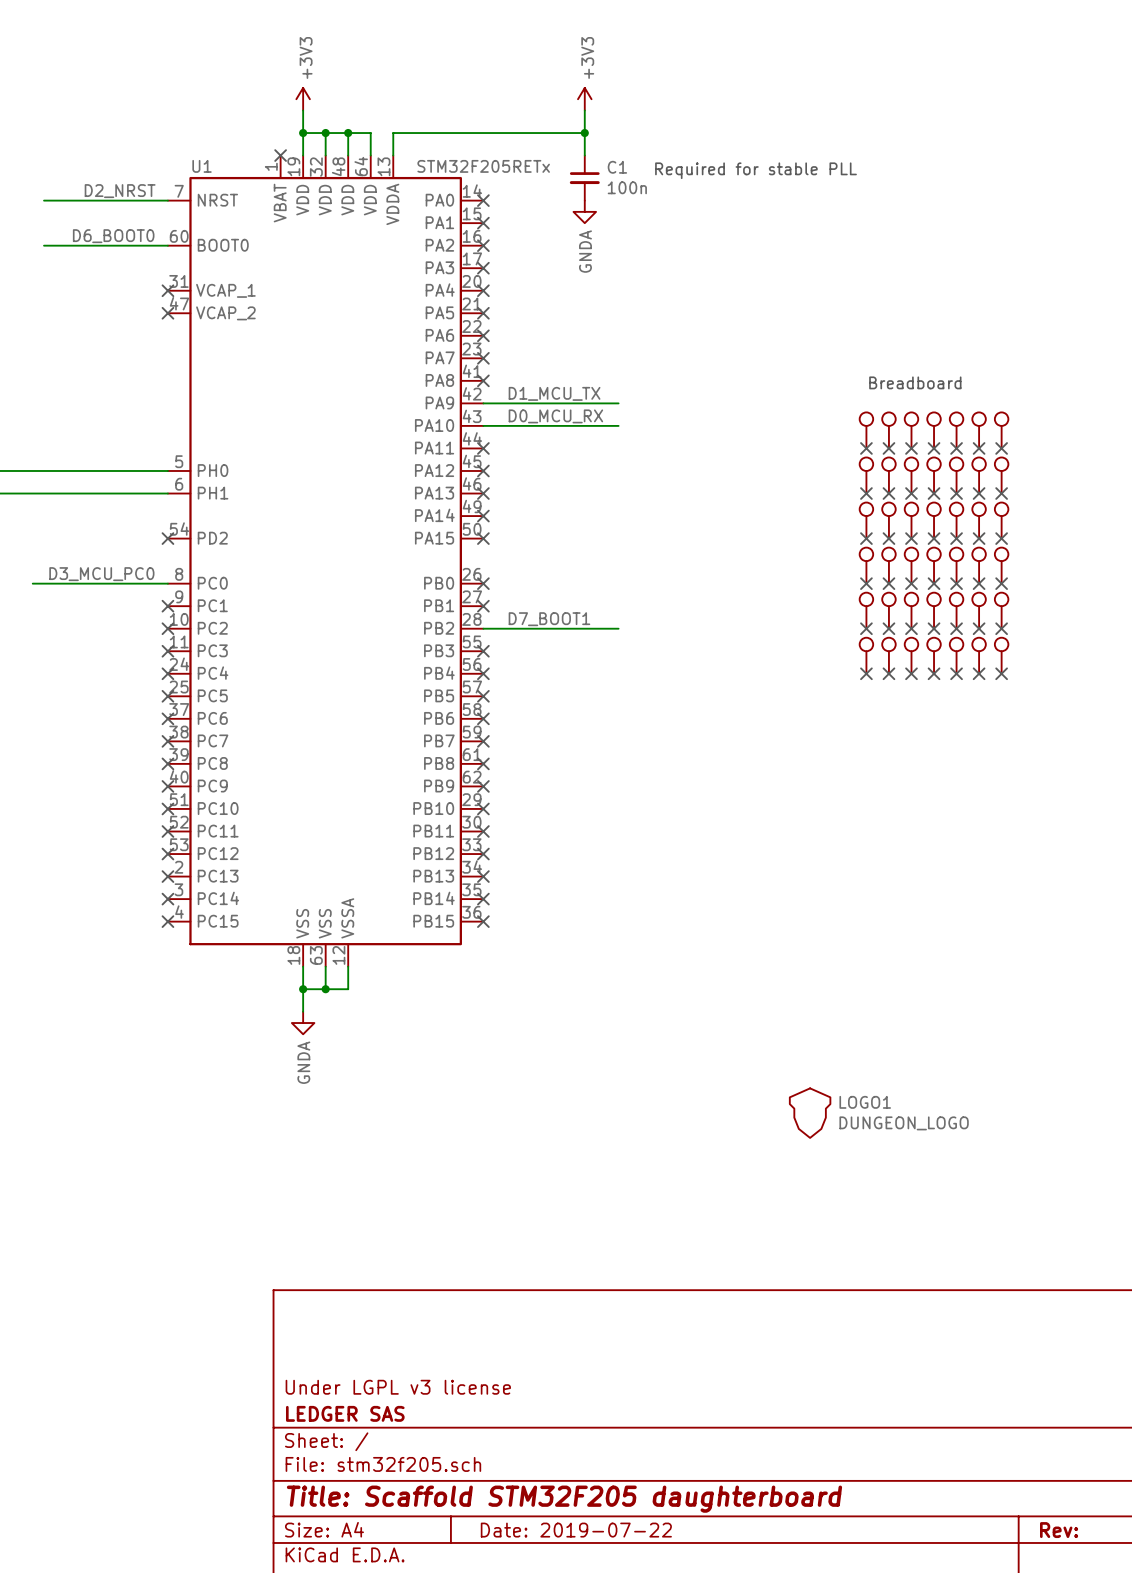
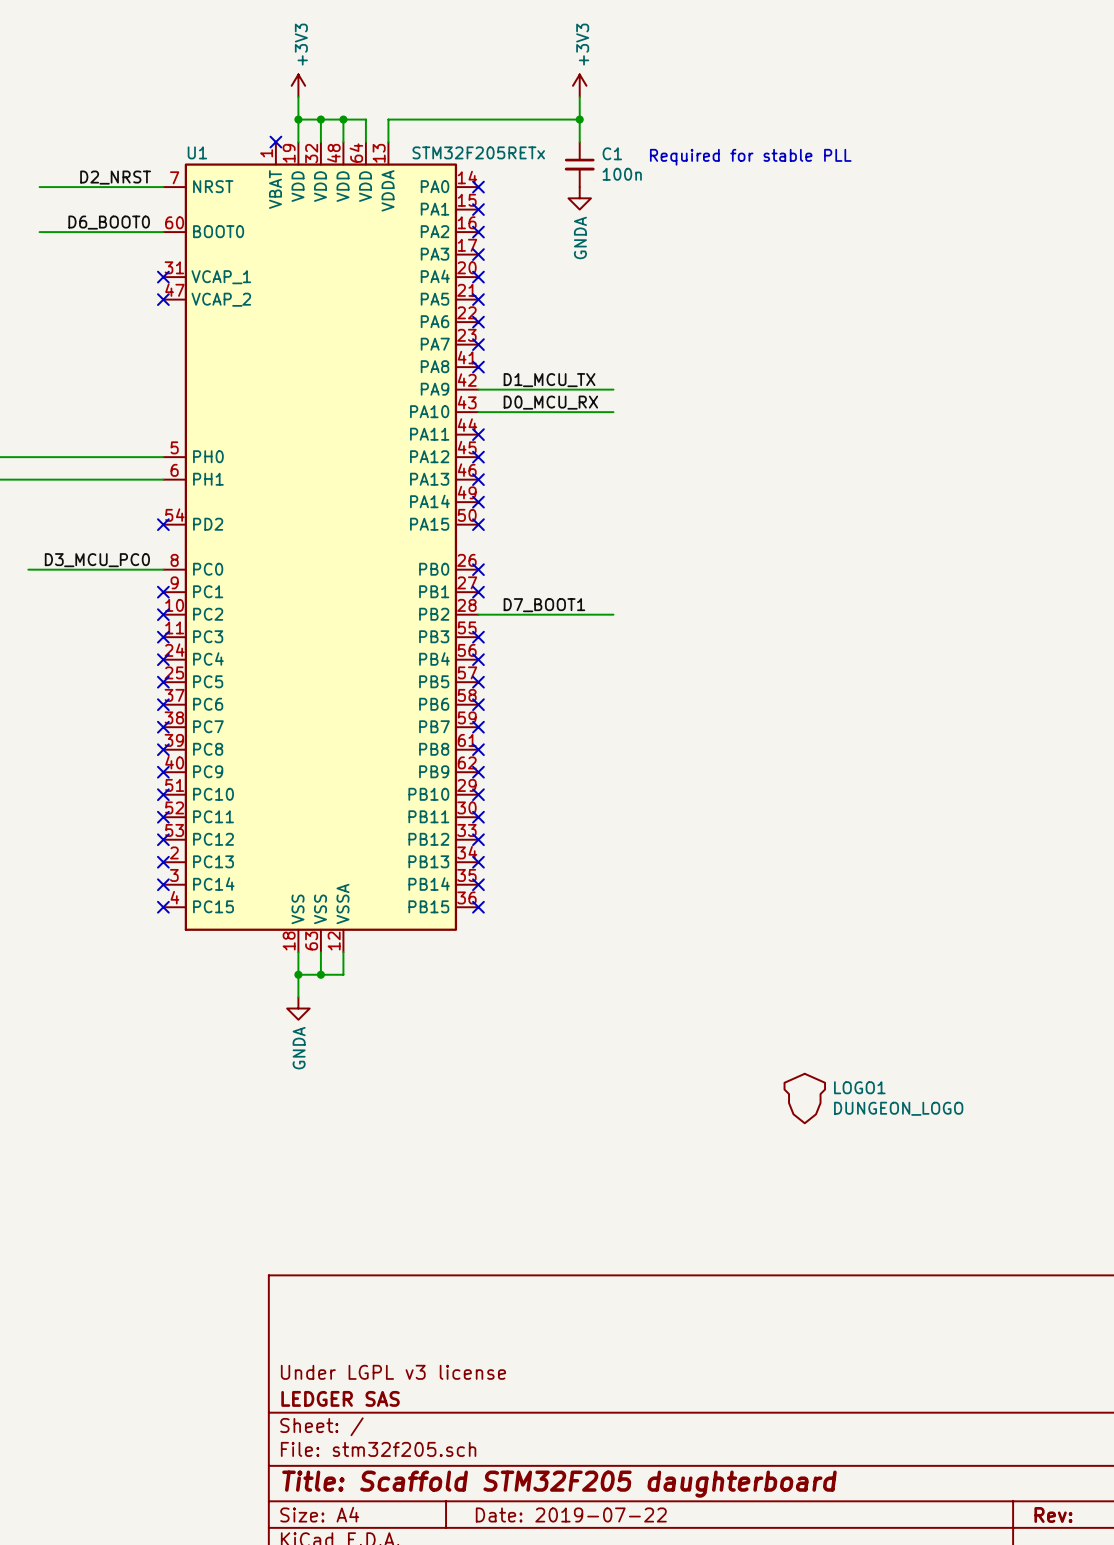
text: Breadboard (915, 382) -> none
part: (866, 430) -> none
part: (888, 430) -> none
part: (911, 430) -> none
part: (934, 430) -> none
part: (956, 430) -> none
part: (979, 430) -> none
part: (1001, 430) -> none
no-connect mark: (866, 448) -> none
no-connect mark: (888, 448) -> none
no-connect mark: (911, 448) -> none
no-connect mark: (934, 448) -> none
no-connect mark: (956, 448) -> none
no-connect mark: (979, 448) -> none
no-connect mark: (1001, 448) -> none
part: (866, 475) -> none
part: (888, 475) -> none
part: (911, 475) -> none
part: (934, 475) -> none
part: (956, 475) -> none
part: (979, 475) -> none
part: (1001, 475) -> none
no-connect mark: (866, 493) -> none
no-connect mark: (888, 493) -> none
no-connect mark: (911, 493) -> none
no-connect mark: (934, 493) -> none
no-connect mark: (956, 493) -> none
no-connect mark: (979, 493) -> none
no-connect mark: (1001, 493) -> none
part: (866, 520) -> none
part: (888, 520) -> none
part: (911, 520) -> none
part: (934, 520) -> none
part: (956, 520) -> none
part: (979, 520) -> none
part: (1001, 520) -> none
no-connect mark: (866, 538) -> none
no-connect mark: (888, 538) -> none
no-connect mark: (911, 538) -> none
no-connect mark: (934, 538) -> none
no-connect mark: (956, 538) -> none
no-connect mark: (979, 538) -> none
no-connect mark: (1001, 538) -> none
part: (866, 565) -> none
part: (888, 565) -> none
part: (911, 565) -> none
part: (934, 565) -> none
part: (956, 565) -> none
part: (979, 565) -> none
part: (1001, 565) -> none
no-connect mark: (866, 583) -> none
no-connect mark: (888, 583) -> none
no-connect mark: (911, 583) -> none
no-connect mark: (934, 583) -> none
no-connect mark: (956, 583) -> none
no-connect mark: (979, 583) -> none
no-connect mark: (1001, 583) -> none
part: (866, 610) -> none
part: (888, 610) -> none
part: (911, 610) -> none
part: (934, 610) -> none
part: (956, 610) -> none
part: (979, 610) -> none
part: (1001, 610) -> none
no-connect mark: (866, 628) -> none
no-connect mark: (888, 628) -> none
no-connect mark: (911, 628) -> none
no-connect mark: (934, 628) -> none
no-connect mark: (956, 628) -> none
no-connect mark: (979, 628) -> none
no-connect mark: (1001, 628) -> none
part: (866, 655) -> none
part: (888, 655) -> none
part: (911, 655) -> none
part: (934, 655) -> none
part: (956, 655) -> none
part: (979, 655) -> none
part: (1001, 655) -> none
no-connect mark: (866, 673) -> none
no-connect mark: (888, 673) -> none
no-connect mark: (911, 673) -> none
no-connect mark: (934, 673) -> none
no-connect mark: (956, 673) -> none
no-connect mark: (979, 673) -> none
no-connect mark: (1001, 673) -> none

